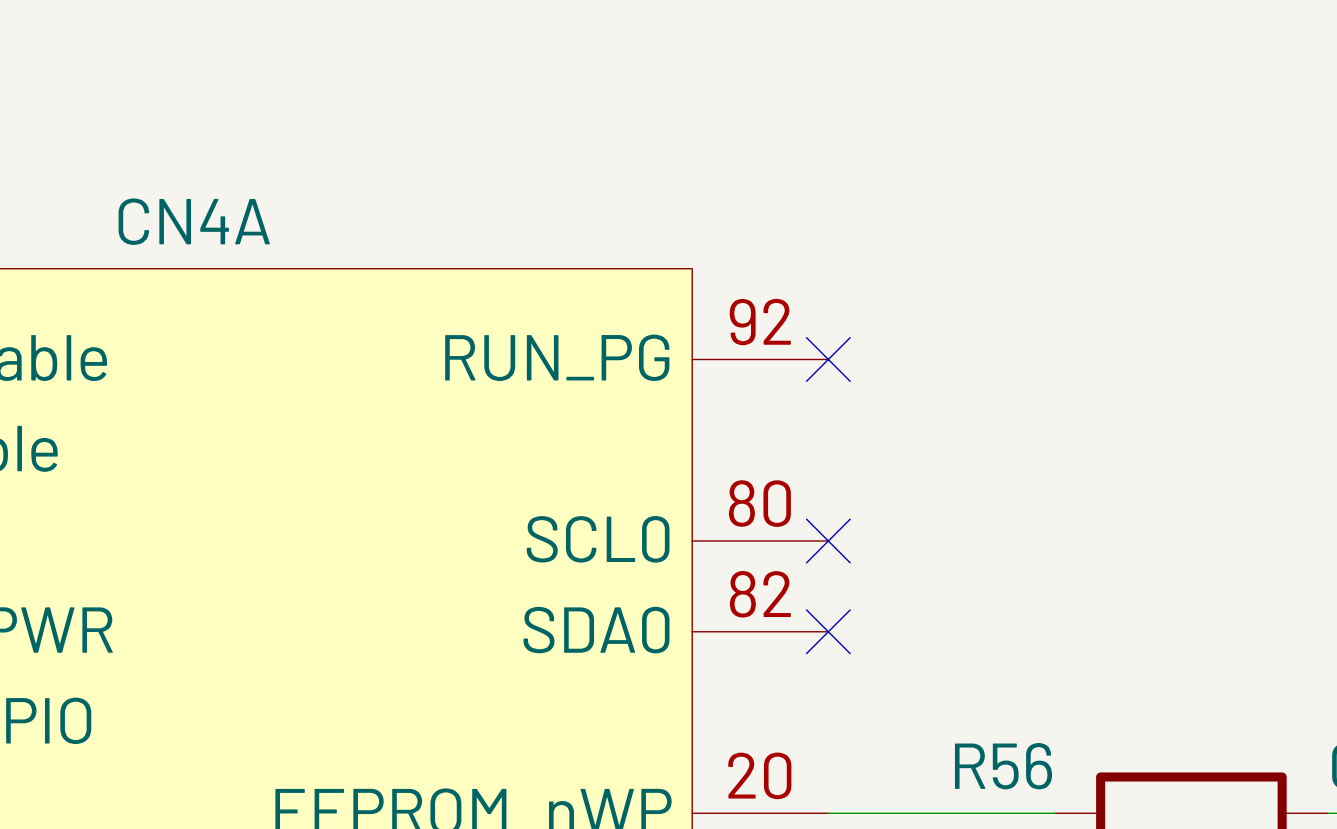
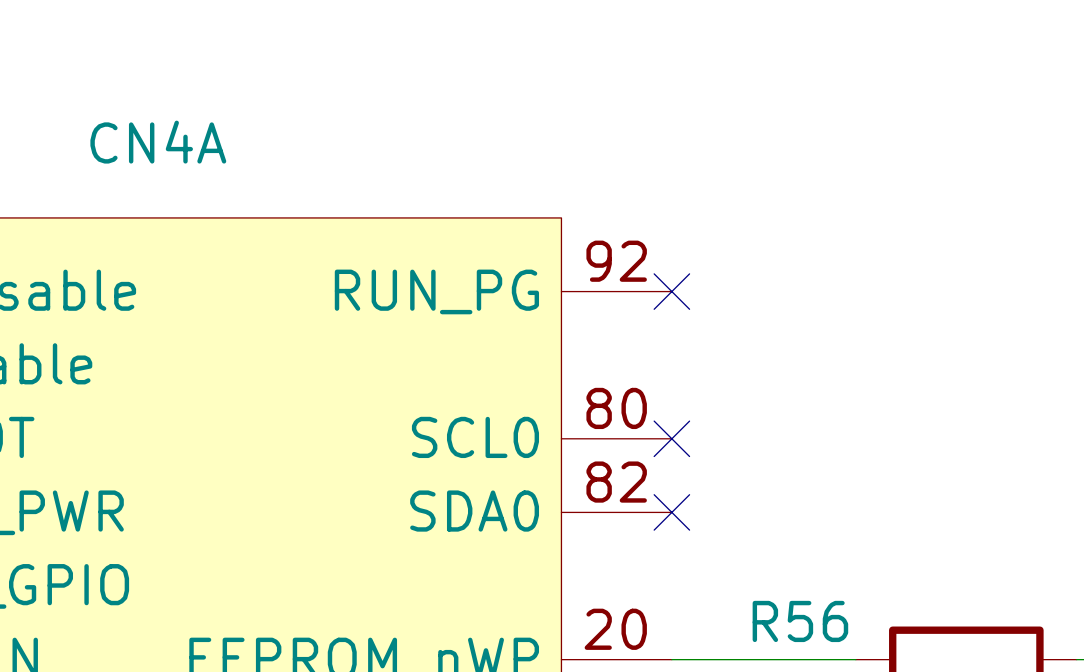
CN4A name position: CN4A (194, 221) -> CN4A (158, 142)

